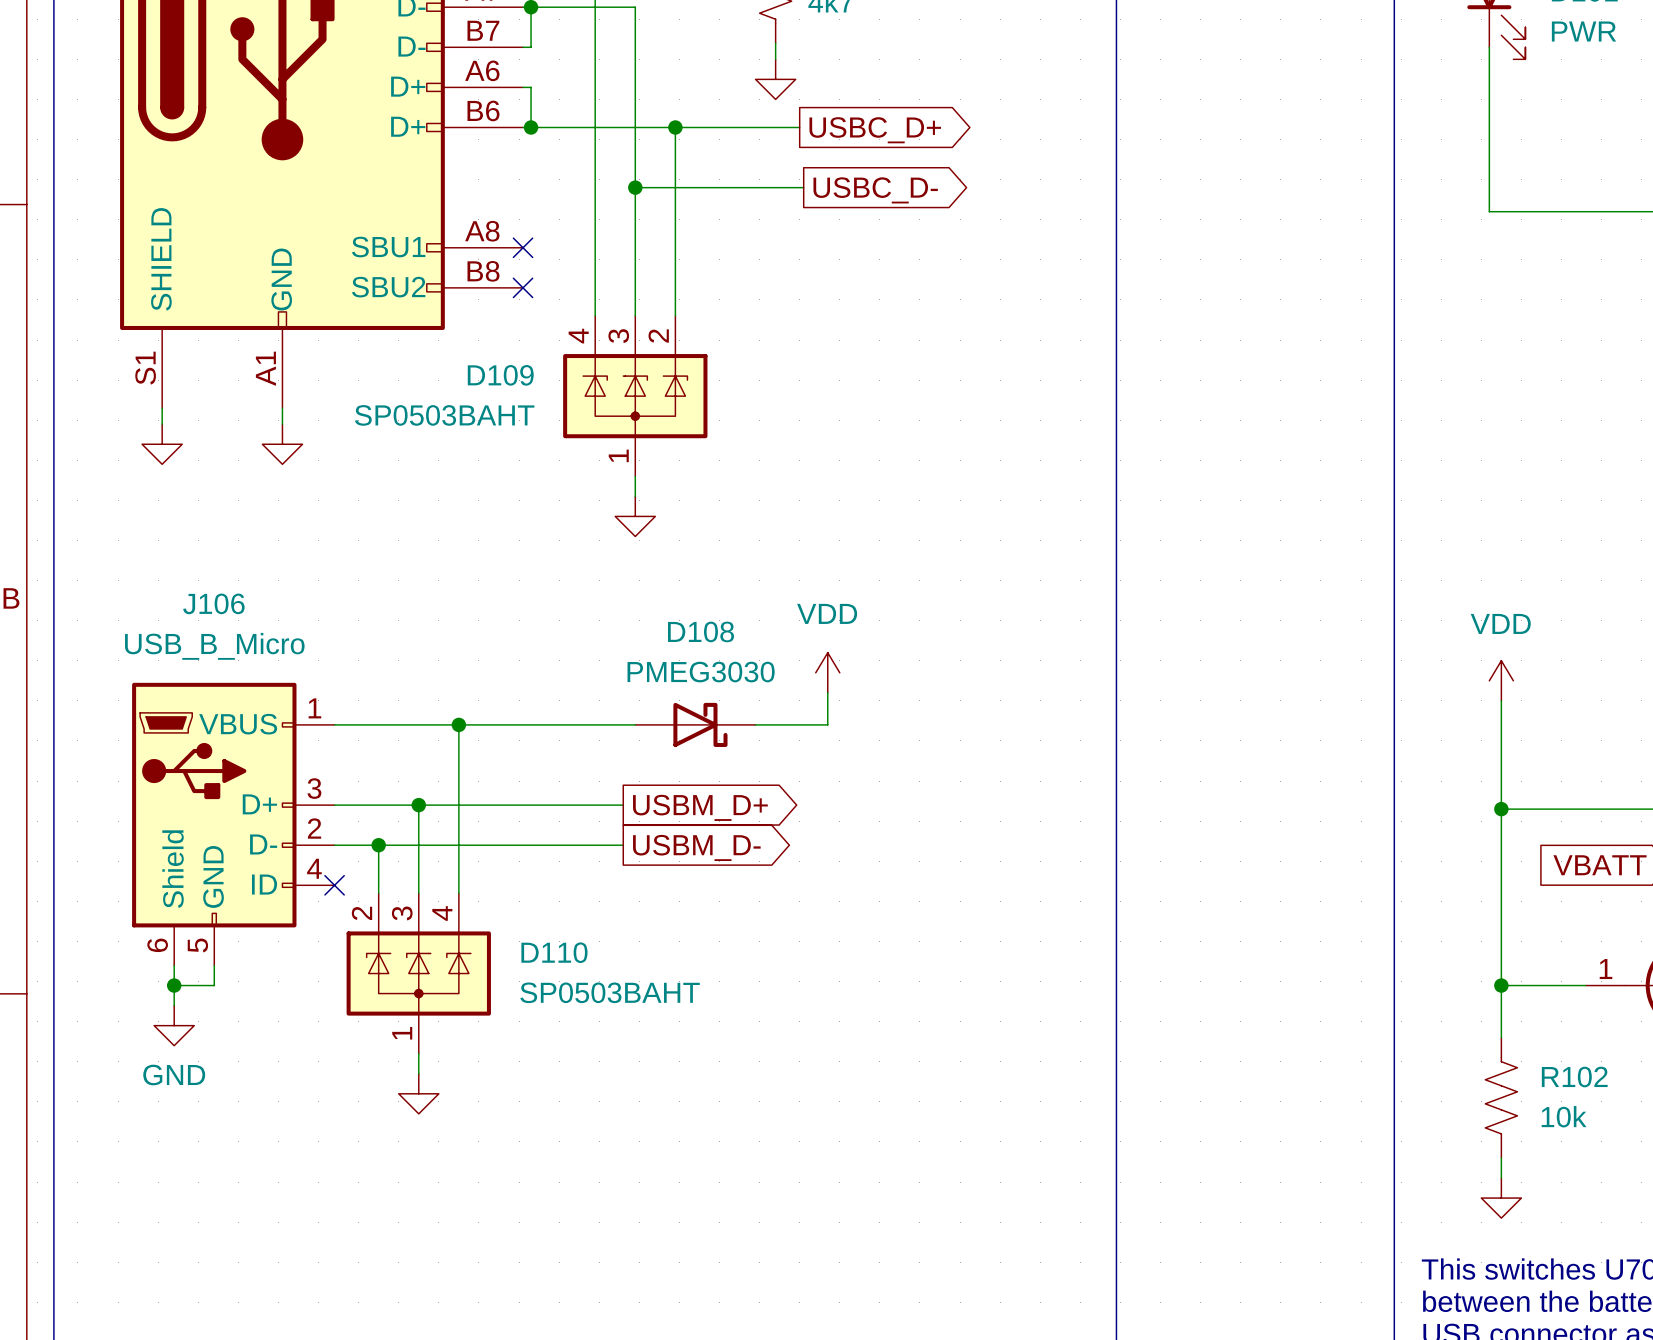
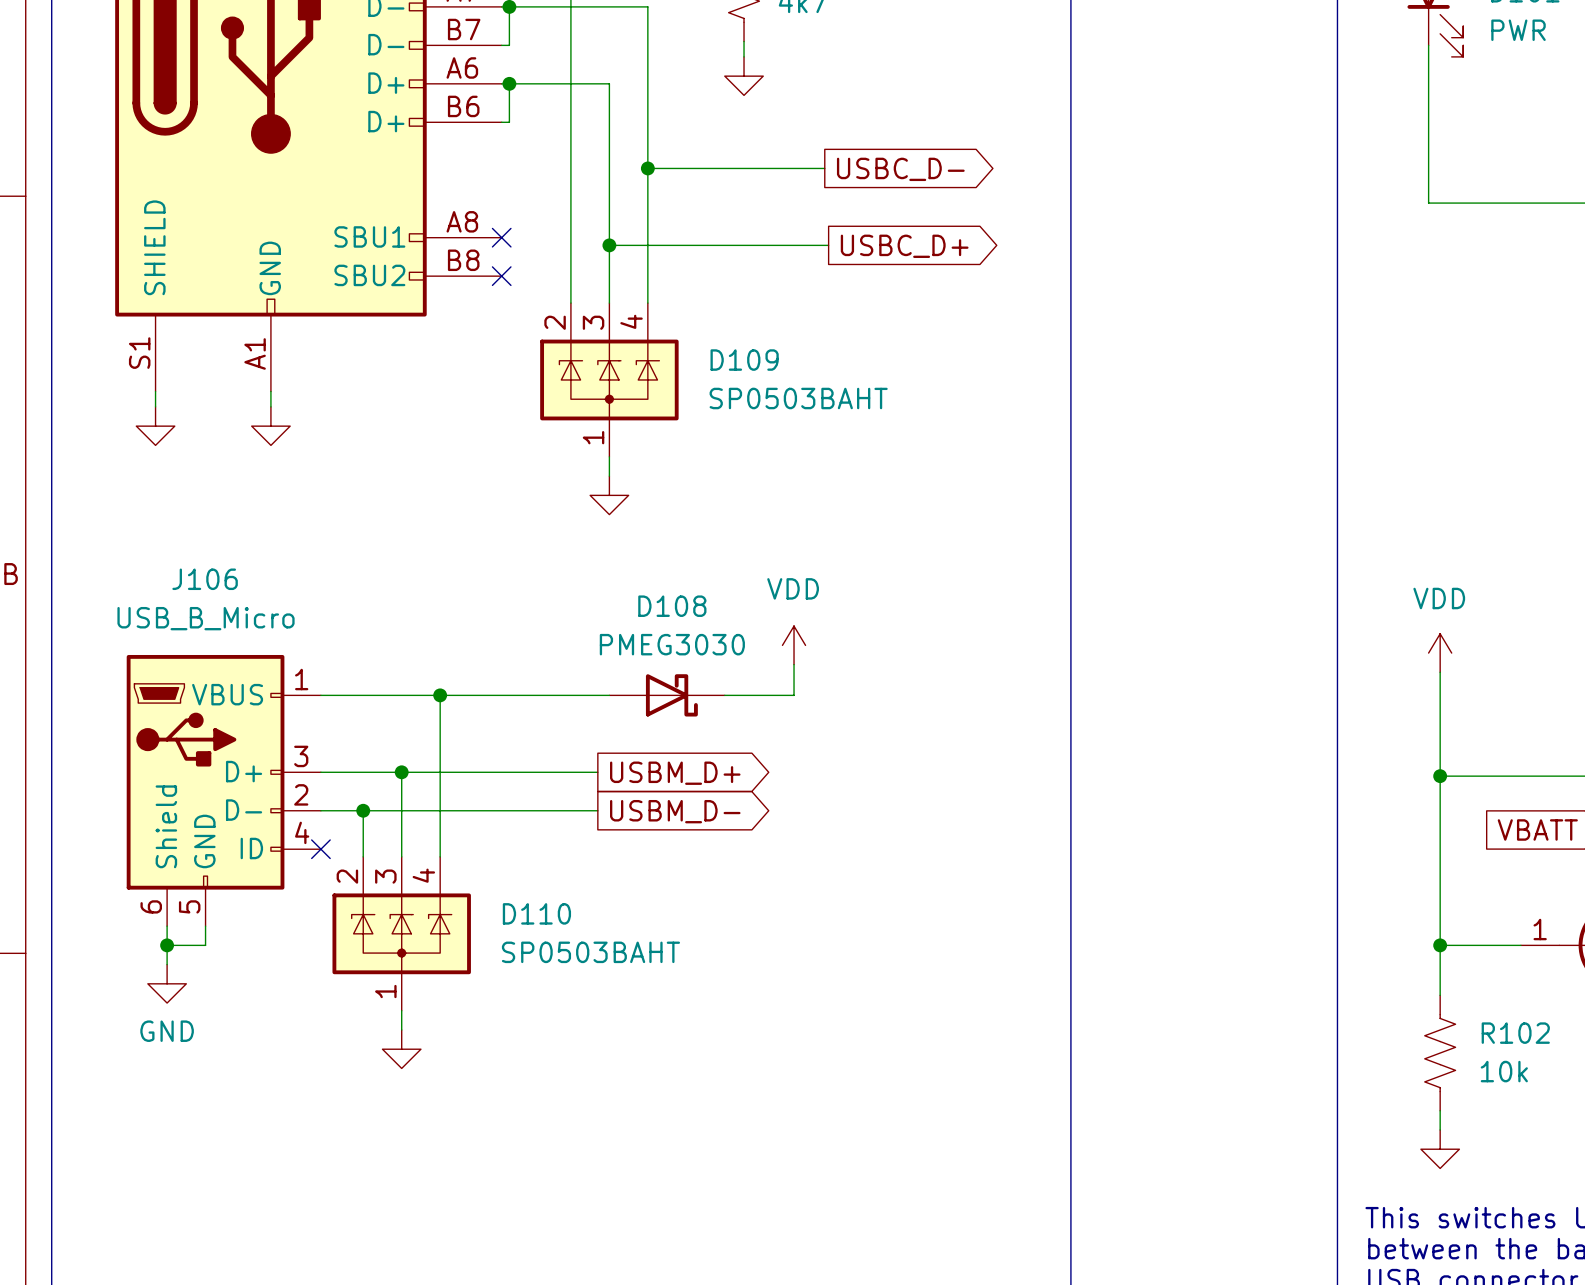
wire: (635, 7) (635, 87) -> (609, 6) (647, 6) (647, 122)
wire: none -> (509, 83) (609, 83)
wire: (531, 127) (799, 127) -> none
junction position: (531, 127) -> (509, 83)
junction: (675, 127) -> none
global label position: USBC_D+ (875, 130) -> USBC_D+ (904, 246)
wire: none -> (647, 168) (824, 168)
junction: none -> (647, 168)
wire: (635, 187) (803, 187) -> none
junction: (635, 187) -> none
global label position: USBC_D- (875, 190) -> USBC_D- (900, 169)
wire: none -> (609, 245) (828, 245)
junction: none -> (609, 245)
D109 flip: as is (635, 396) -> left-right (609, 379)

